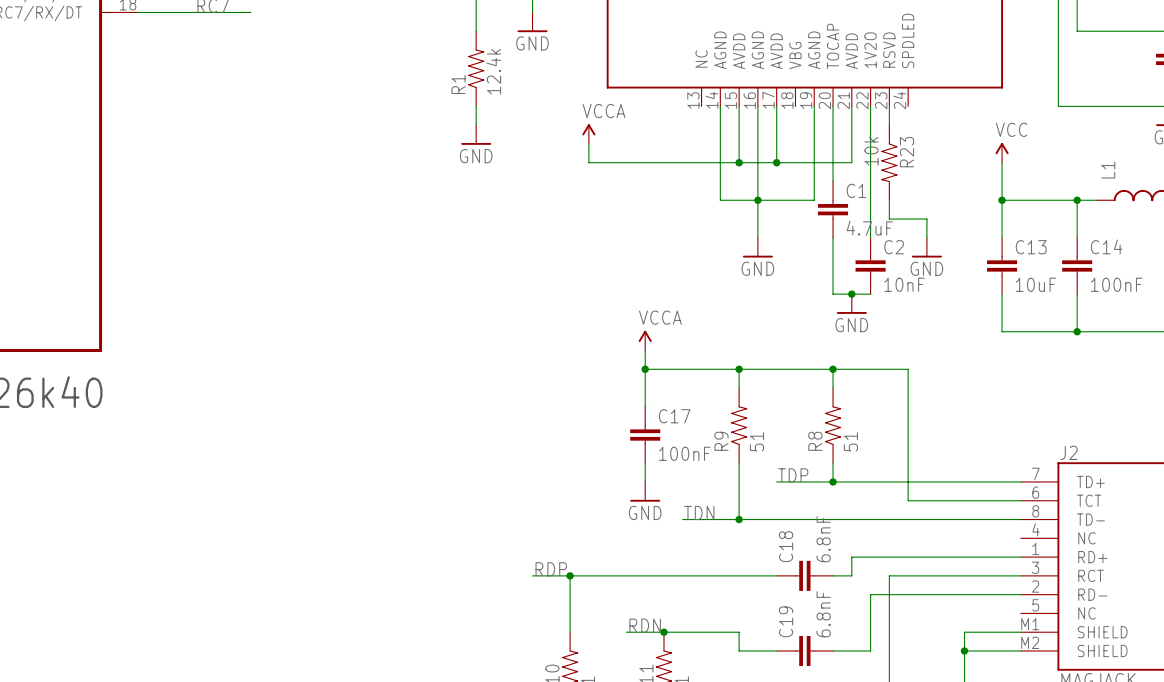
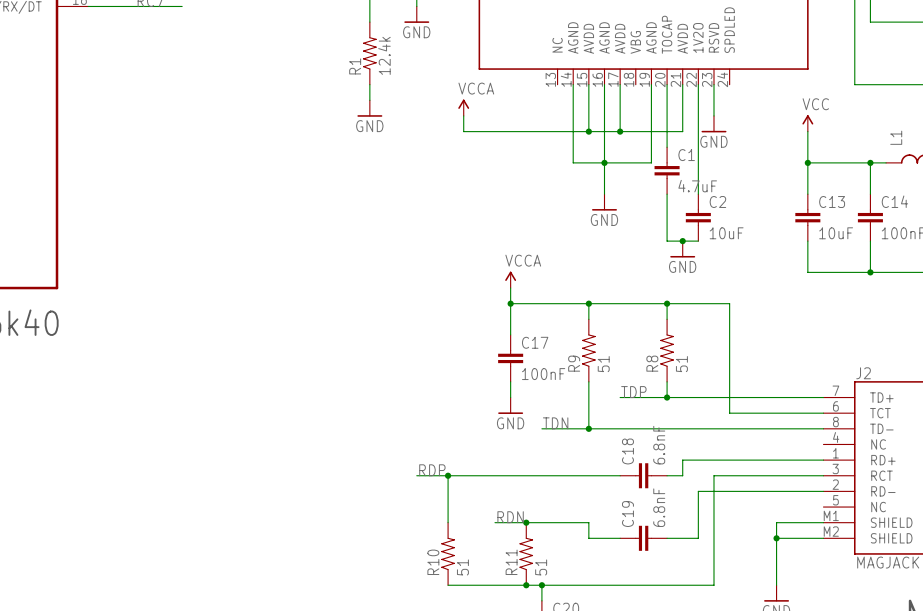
R23: 10k (889, 162) -> none
wire: (889, 200) (889, 219) (926, 219) (926, 237) -> none
power symbol position: GND (926, 247) -> GND (713, 124)
C2 value: 10nF (904, 284) -> 10uF (726, 233)

